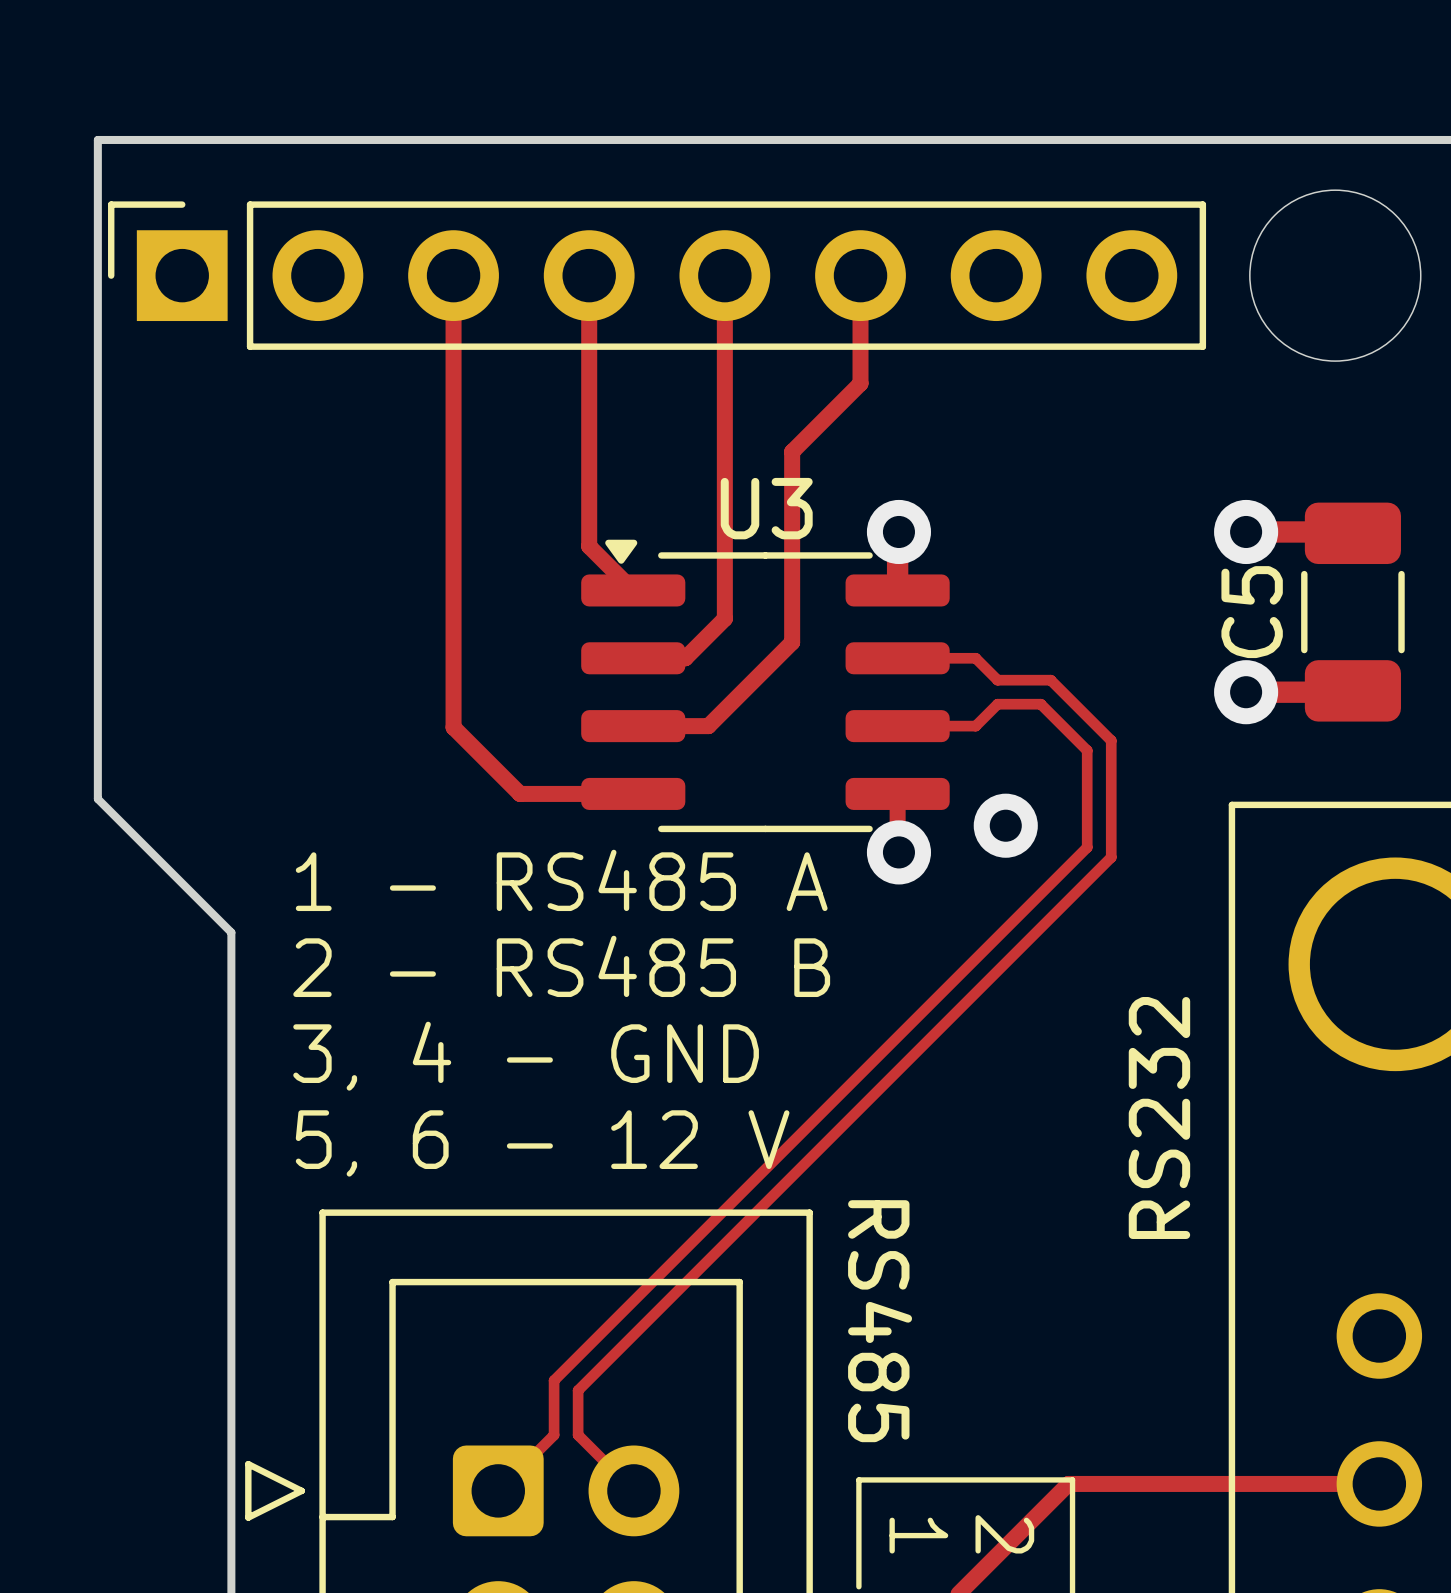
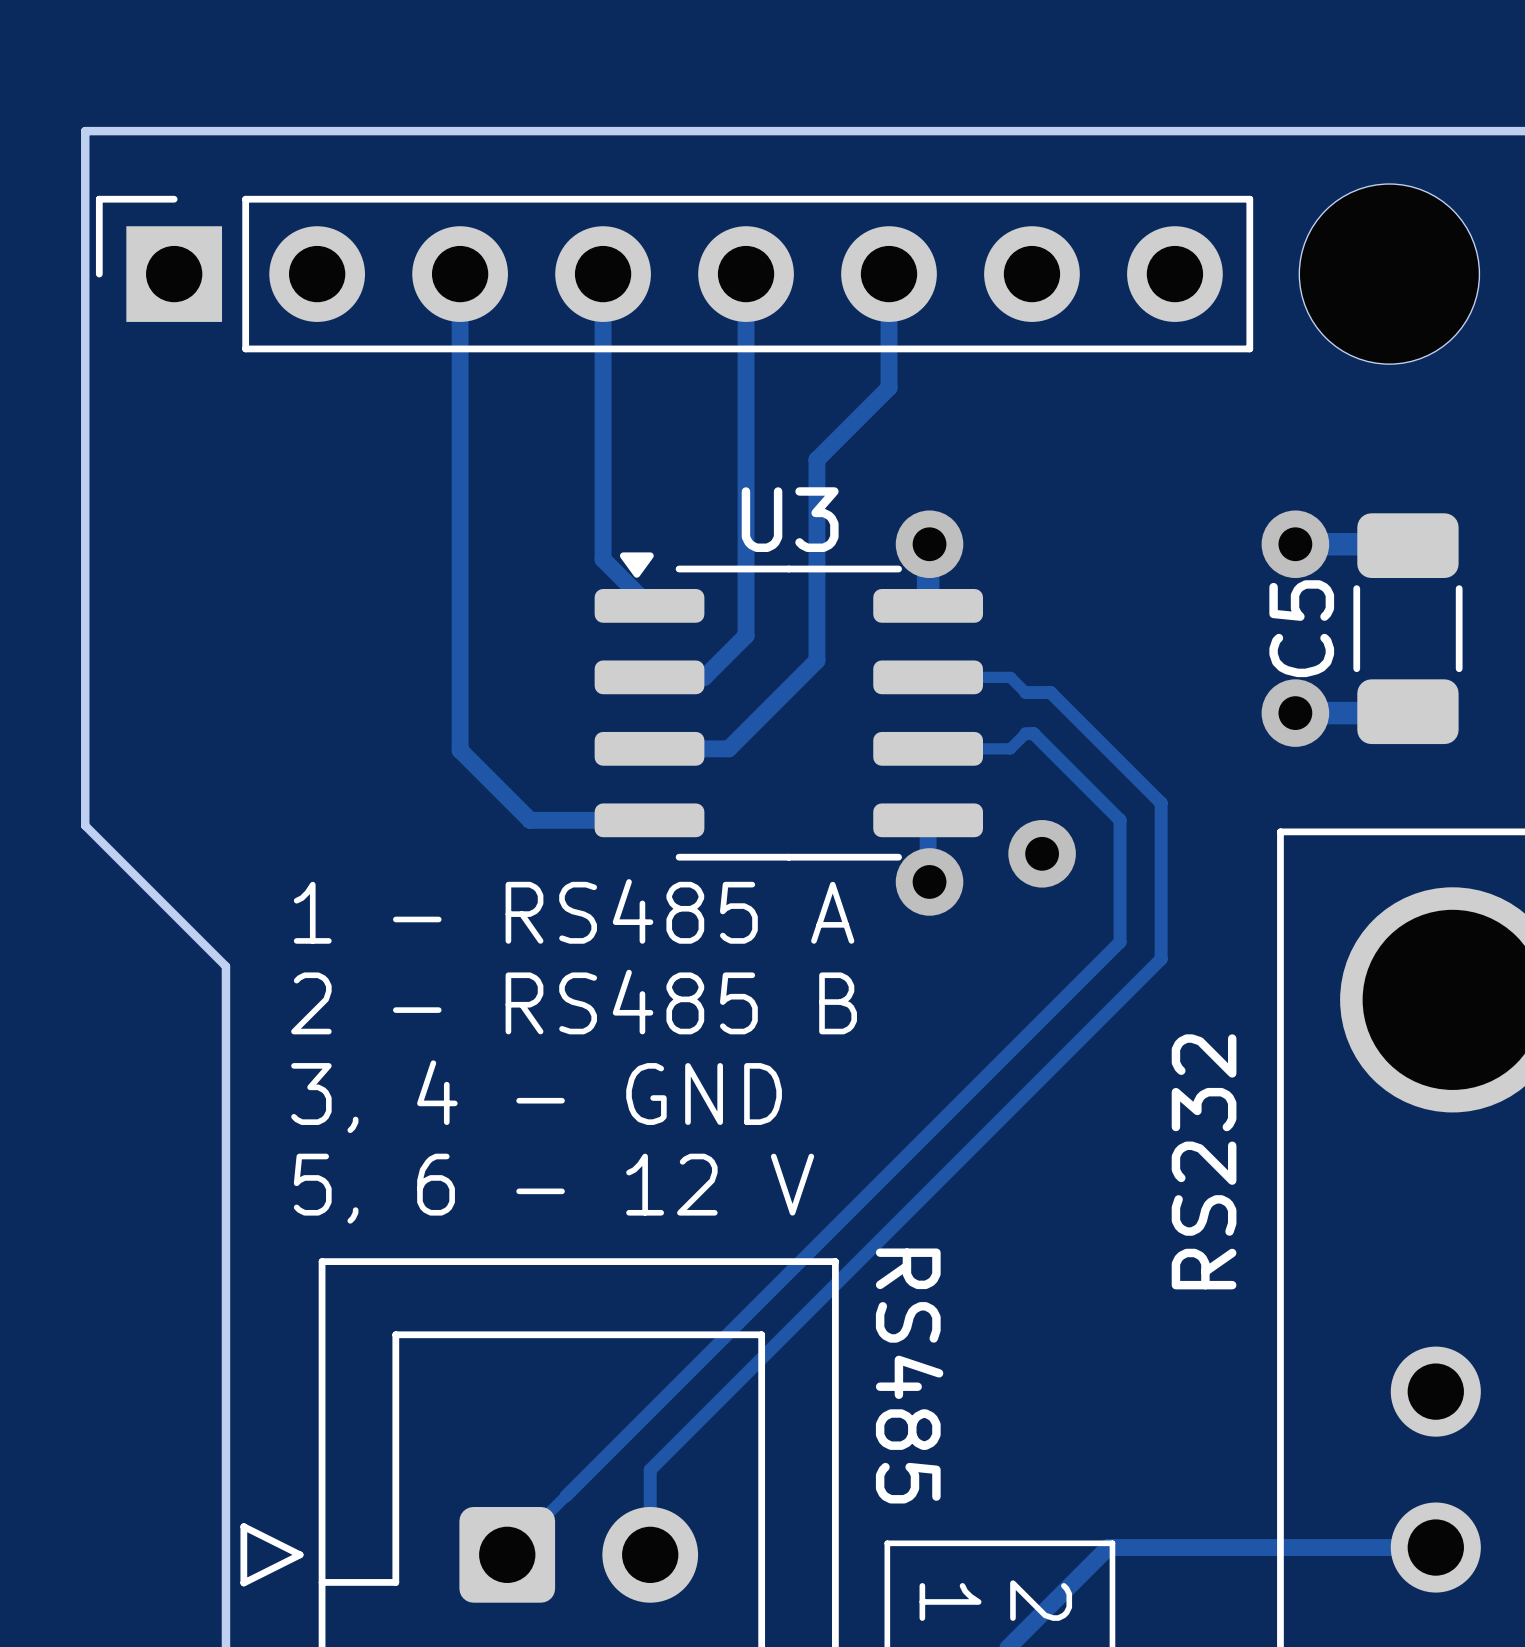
track: (990, 672) (997, 680) (1050, 680) (1111, 740) (1111, 857) (578, 1390) (578, 1435) (633, 1490) -> (1025, 692) (1050, 692) (1161, 803) (1161, 959) (650, 1469) (650, 1554)
track: (990, 711) (997, 704) (1040, 704) (1087, 750) (1087, 847) (554, 1380) (554, 1435) -> (1025, 733) (1033, 733) (1120, 820) (1120, 942) (566, 1496)

